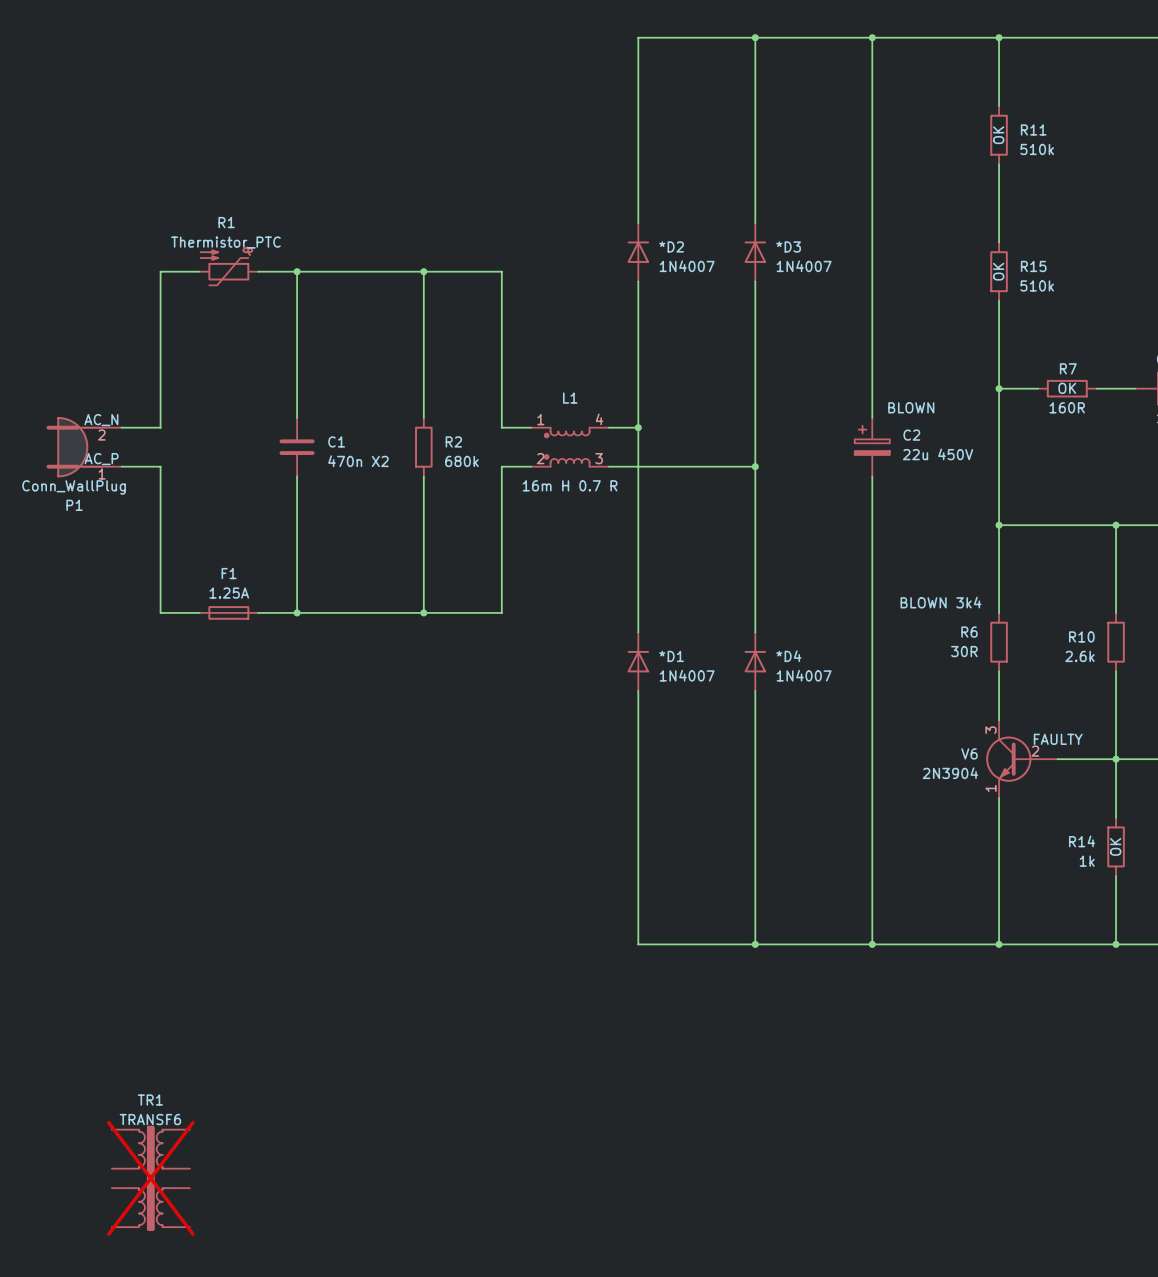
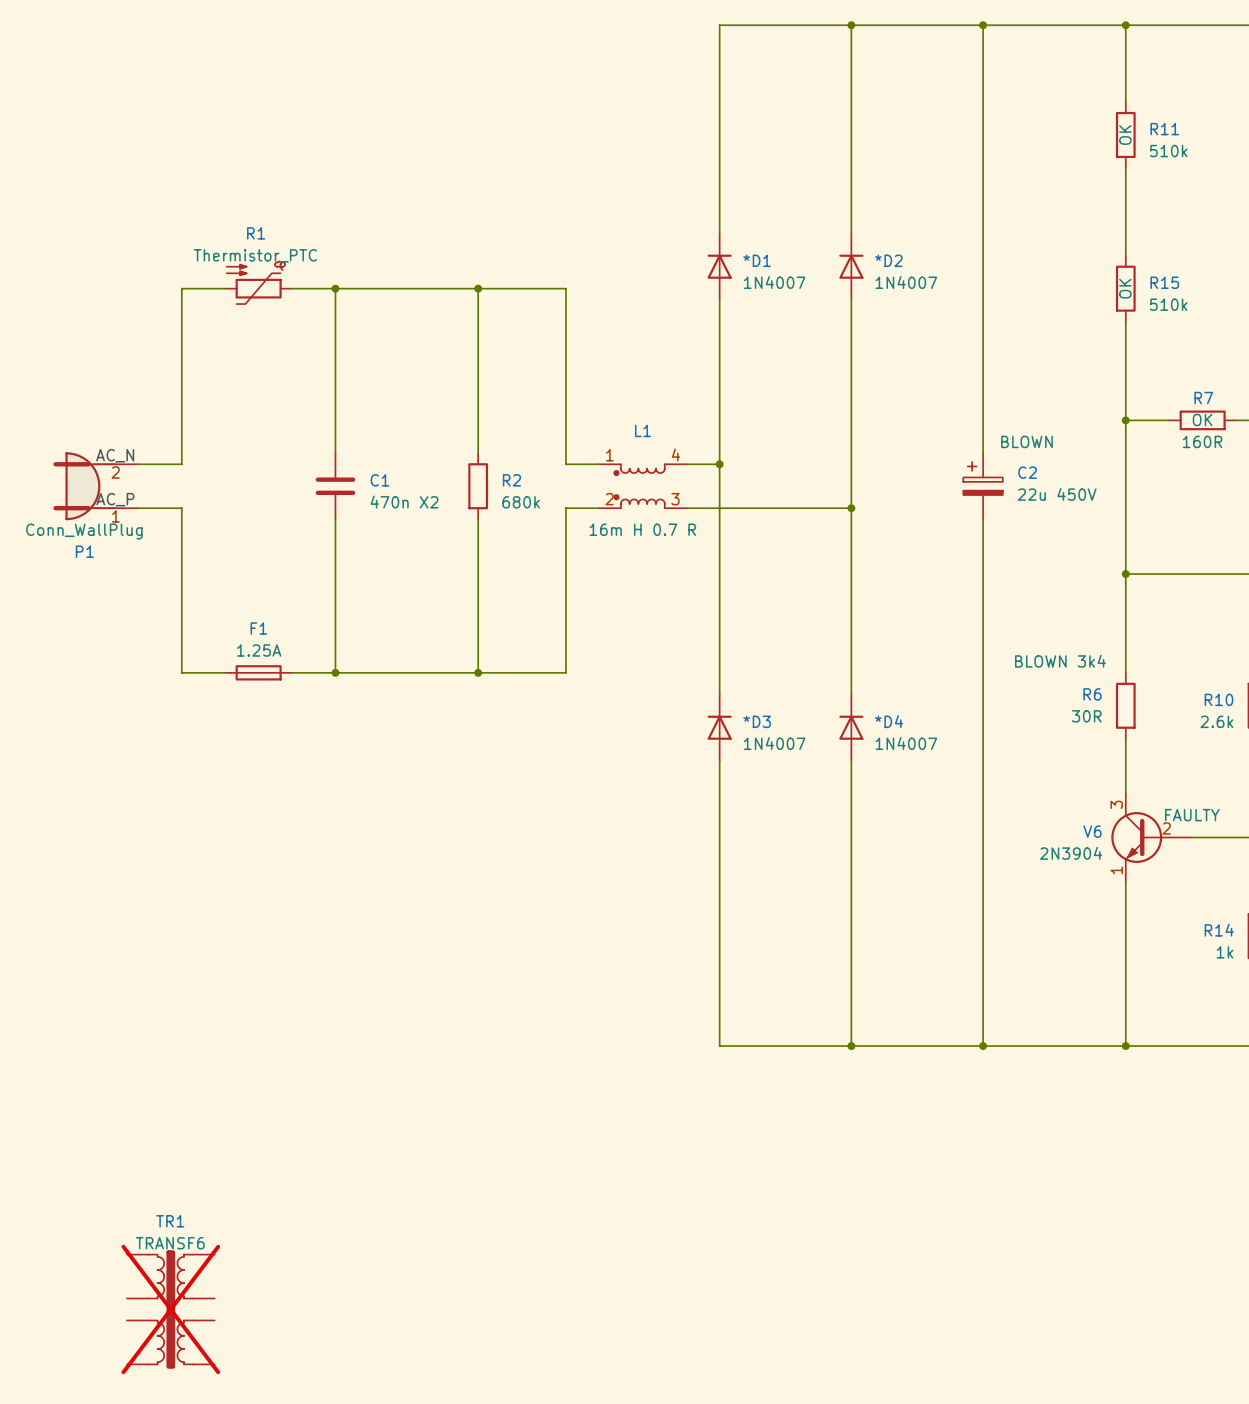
*D2 name: *D2 (671, 246) -> *D1 (757, 260)
*D3 name: *D3 (788, 246) -> *D2 (888, 260)
*D1 name: *D1 (671, 656) -> *D3 (757, 721)

